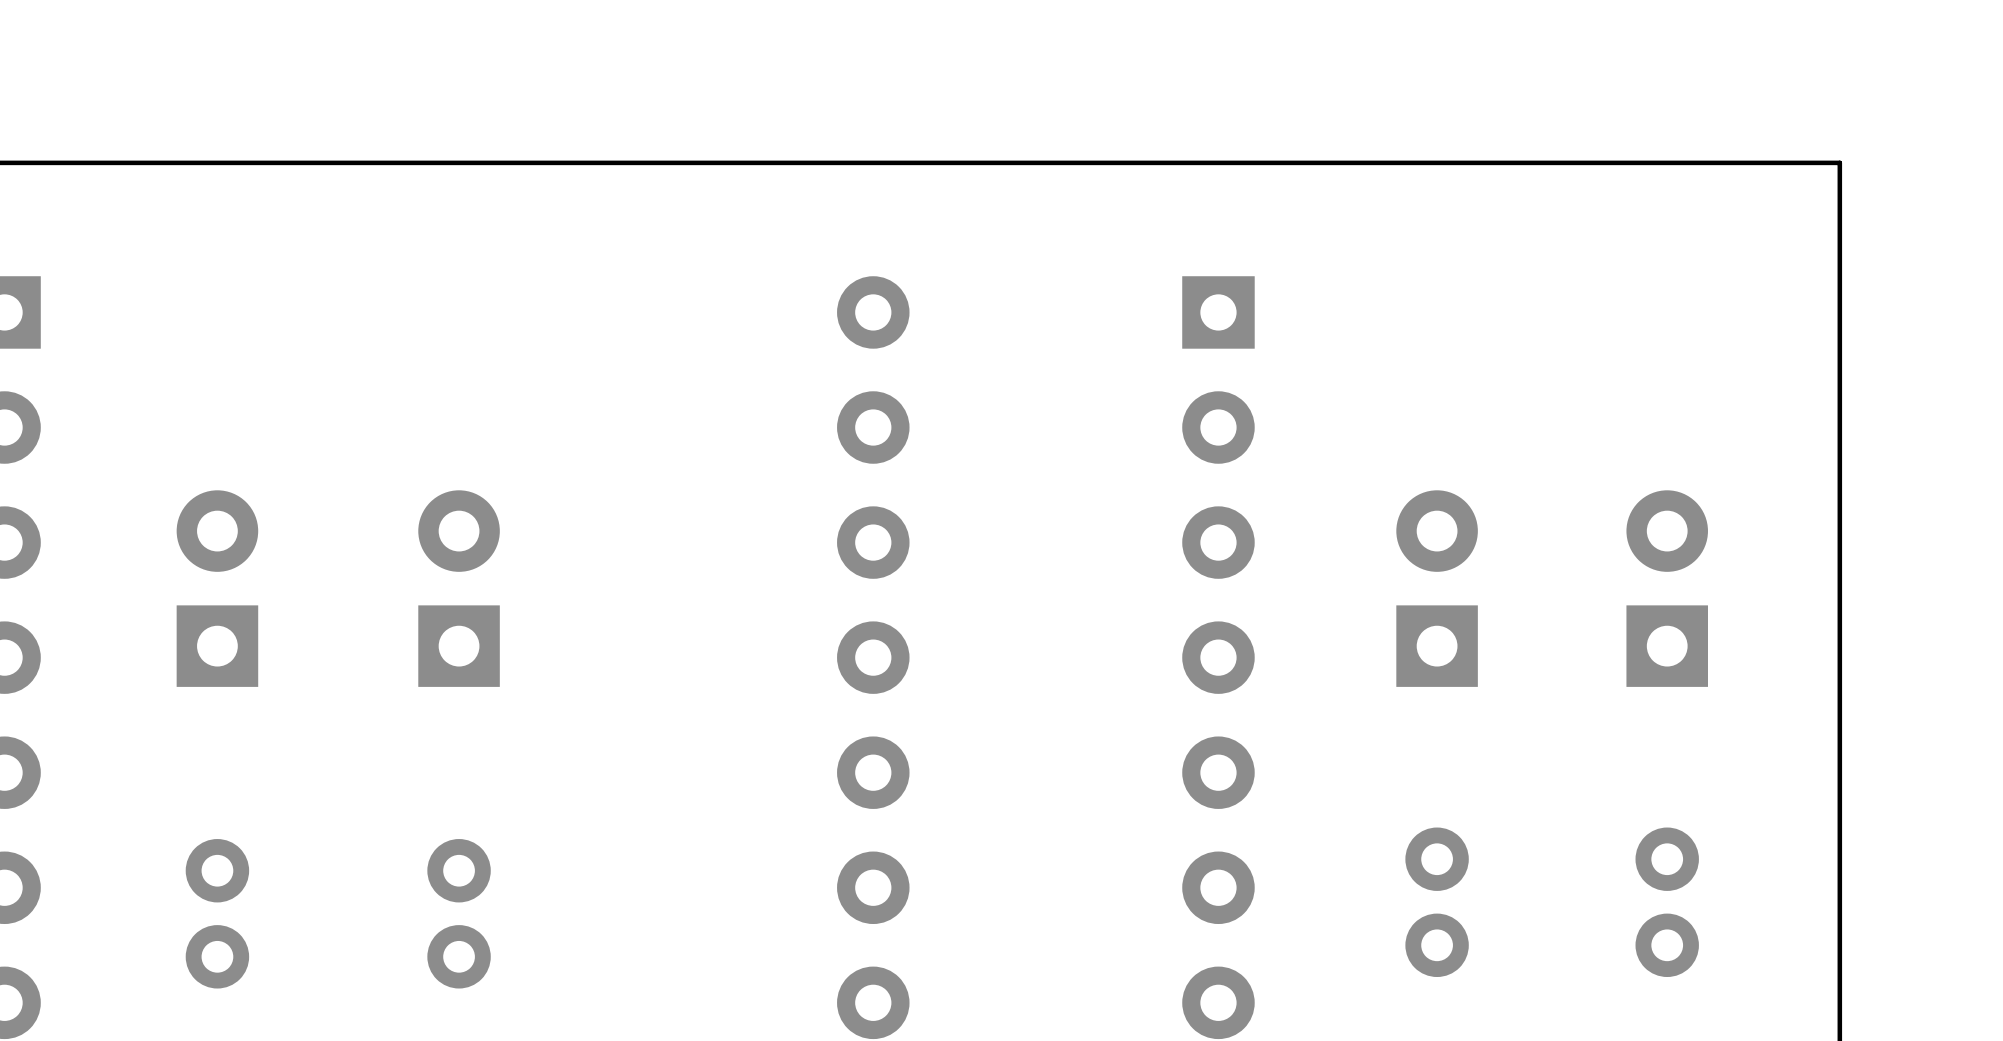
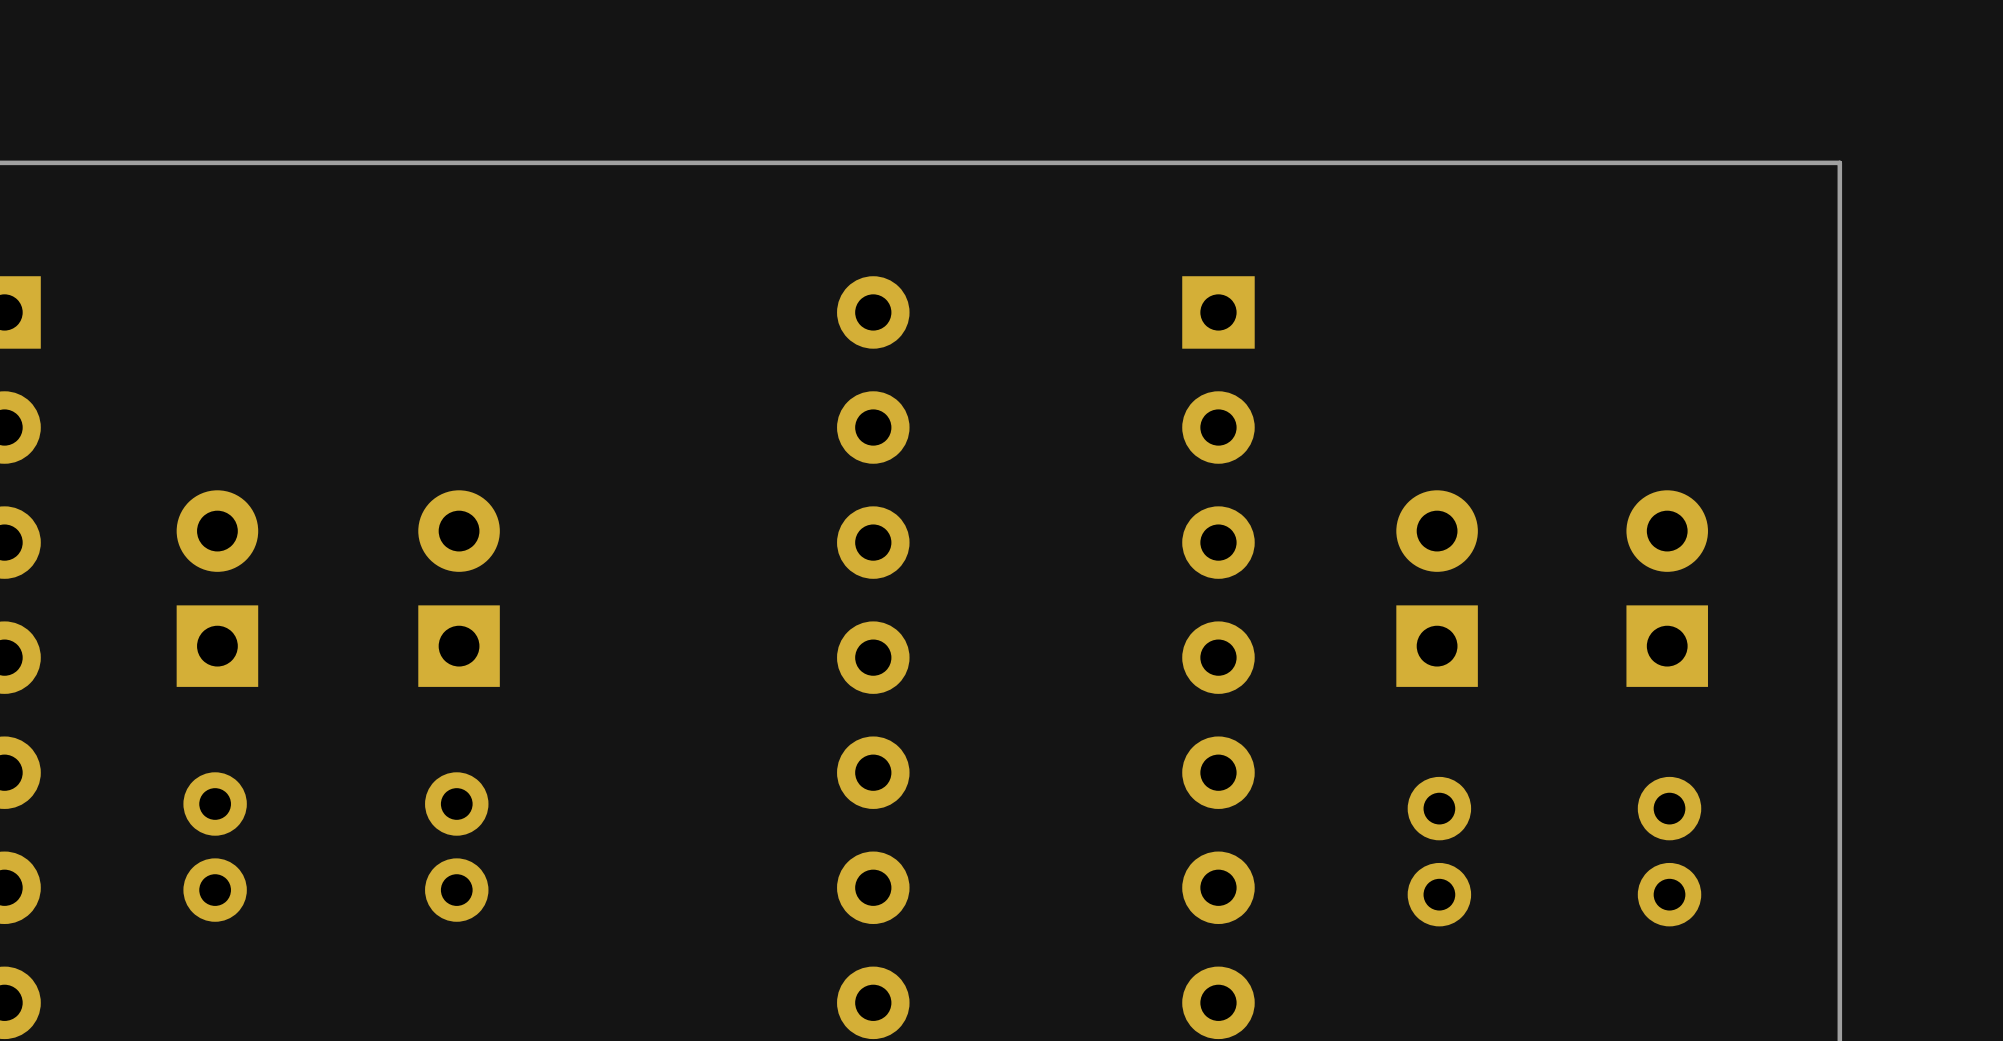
part position: (1437, 902) -> (1439, 851)
part position: (1667, 902) -> (1669, 851)
part position: (217, 913) -> (215, 847)
part position: (459, 913) -> (456, 847)

